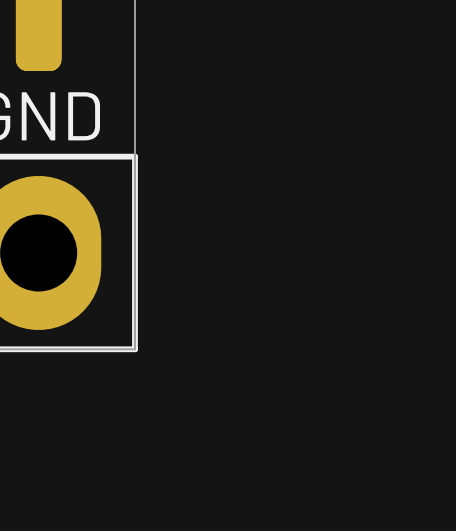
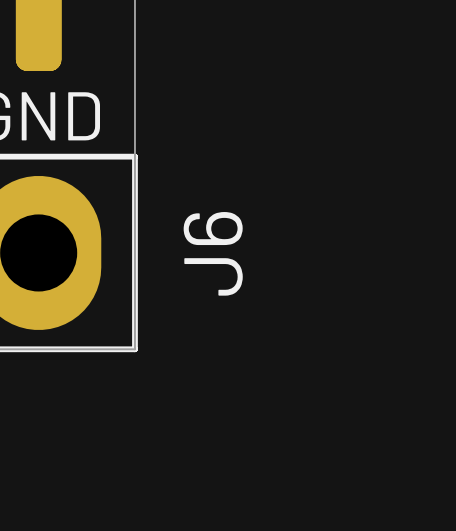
J6 name: none -> J6 (213, 253)

